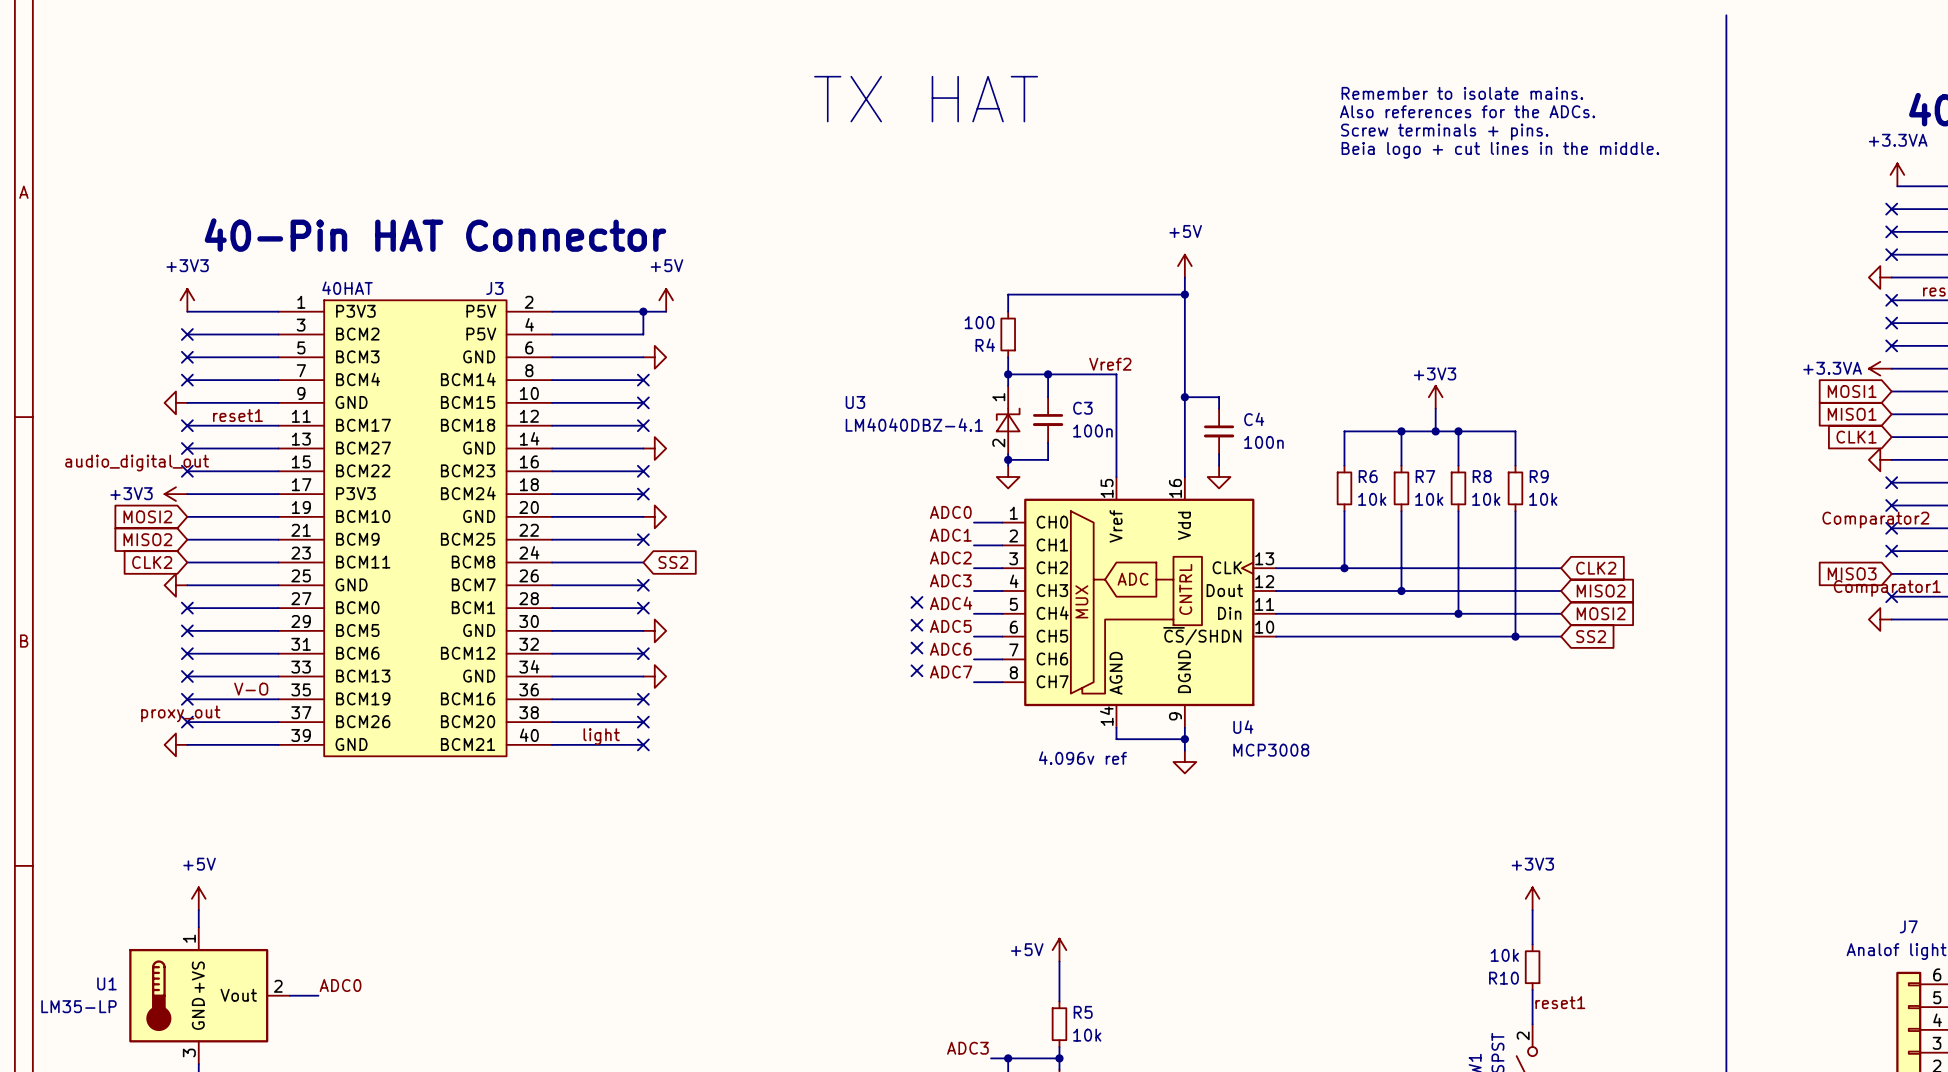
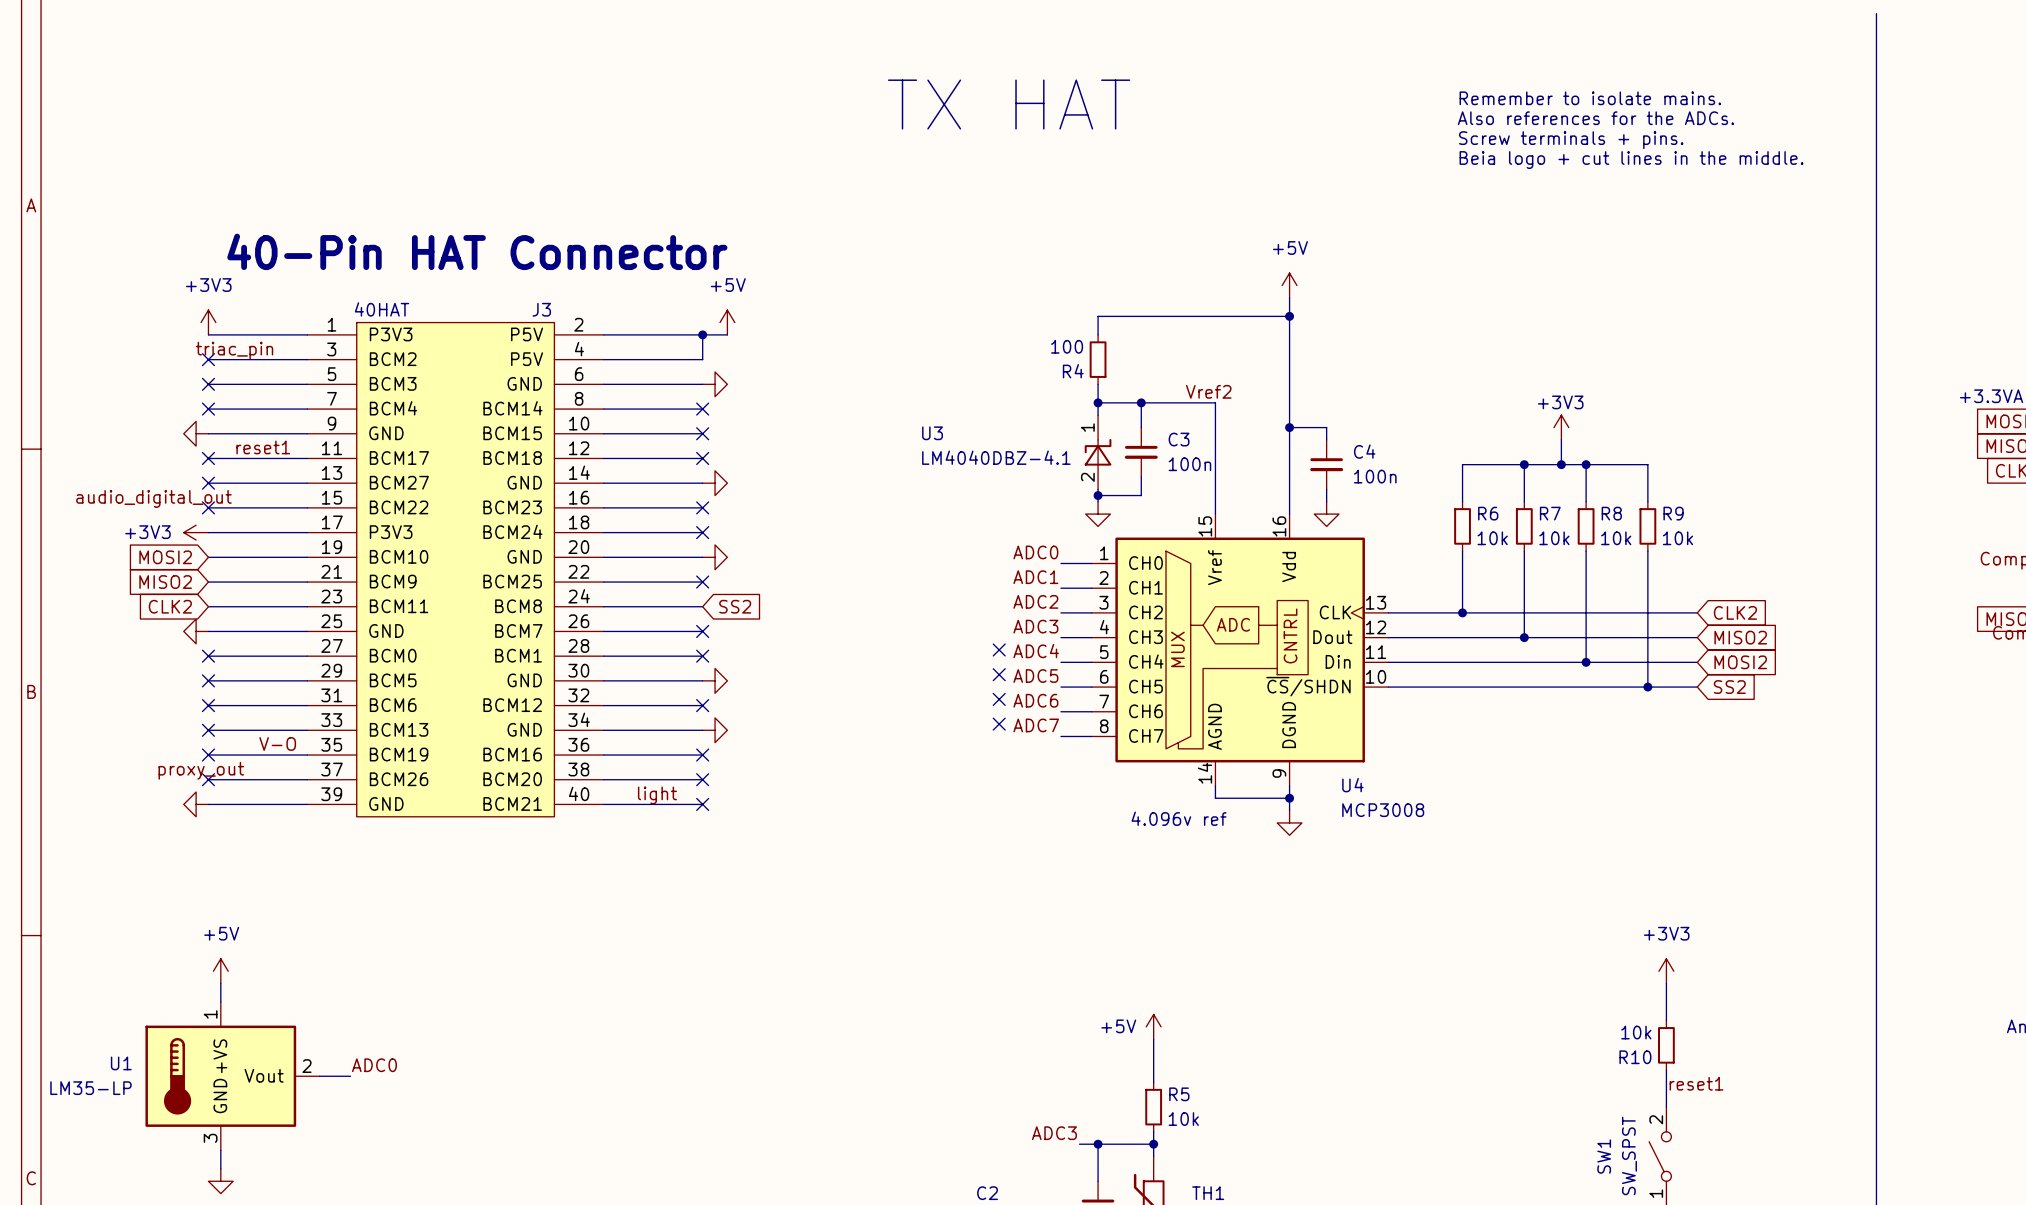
label: none -> triac_pin (234, 350)

